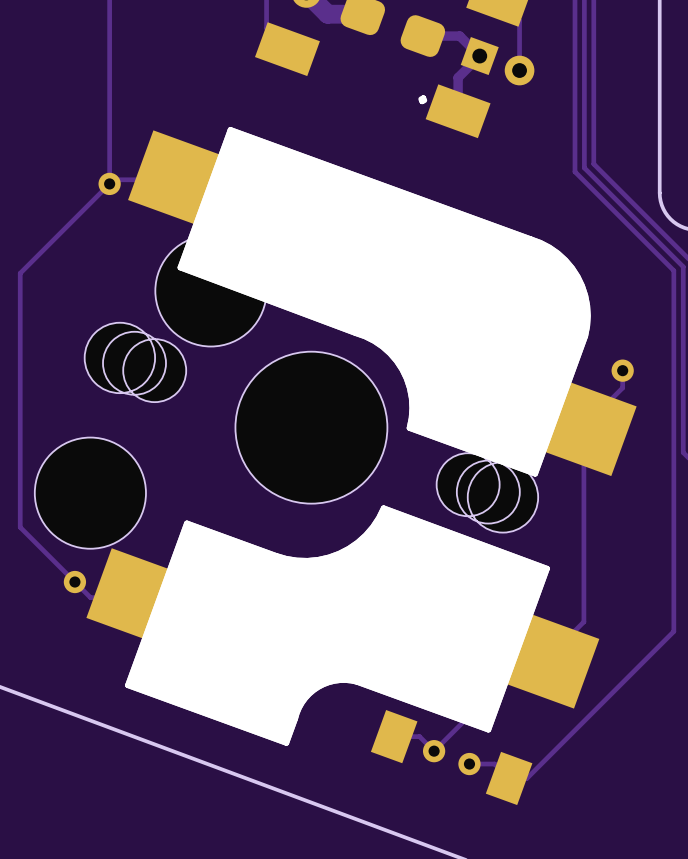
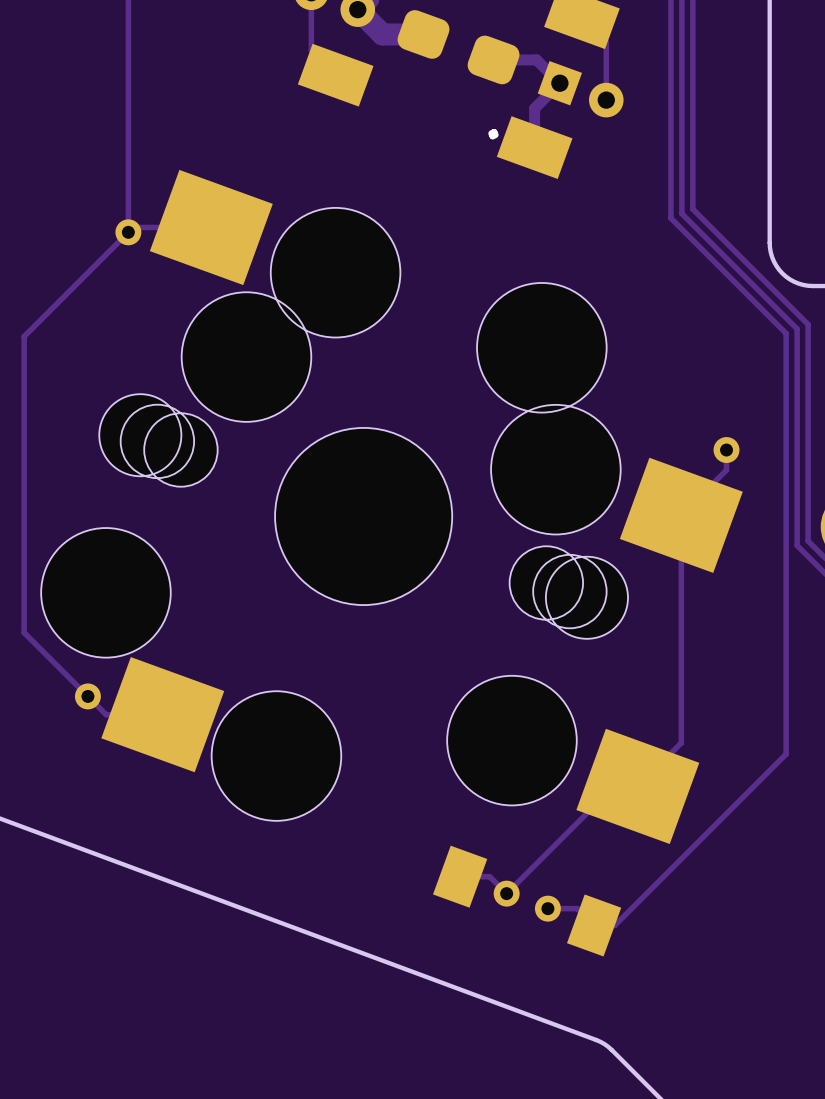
part footprint: [34, 127, 637, 806] -> [41, 169, 743, 957]

